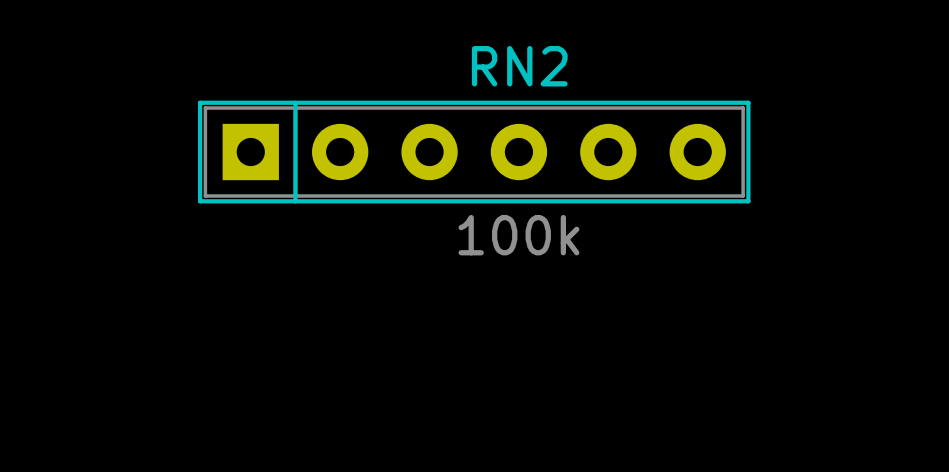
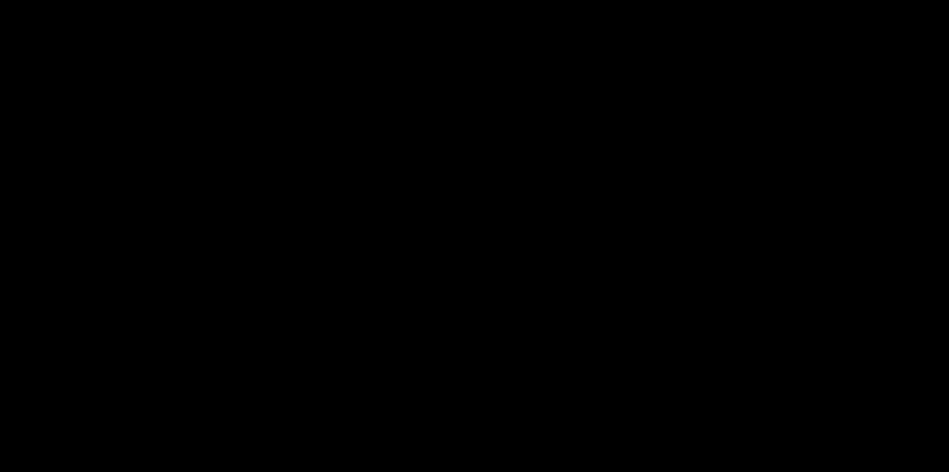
RN2: 100k (474, 152) -> none

